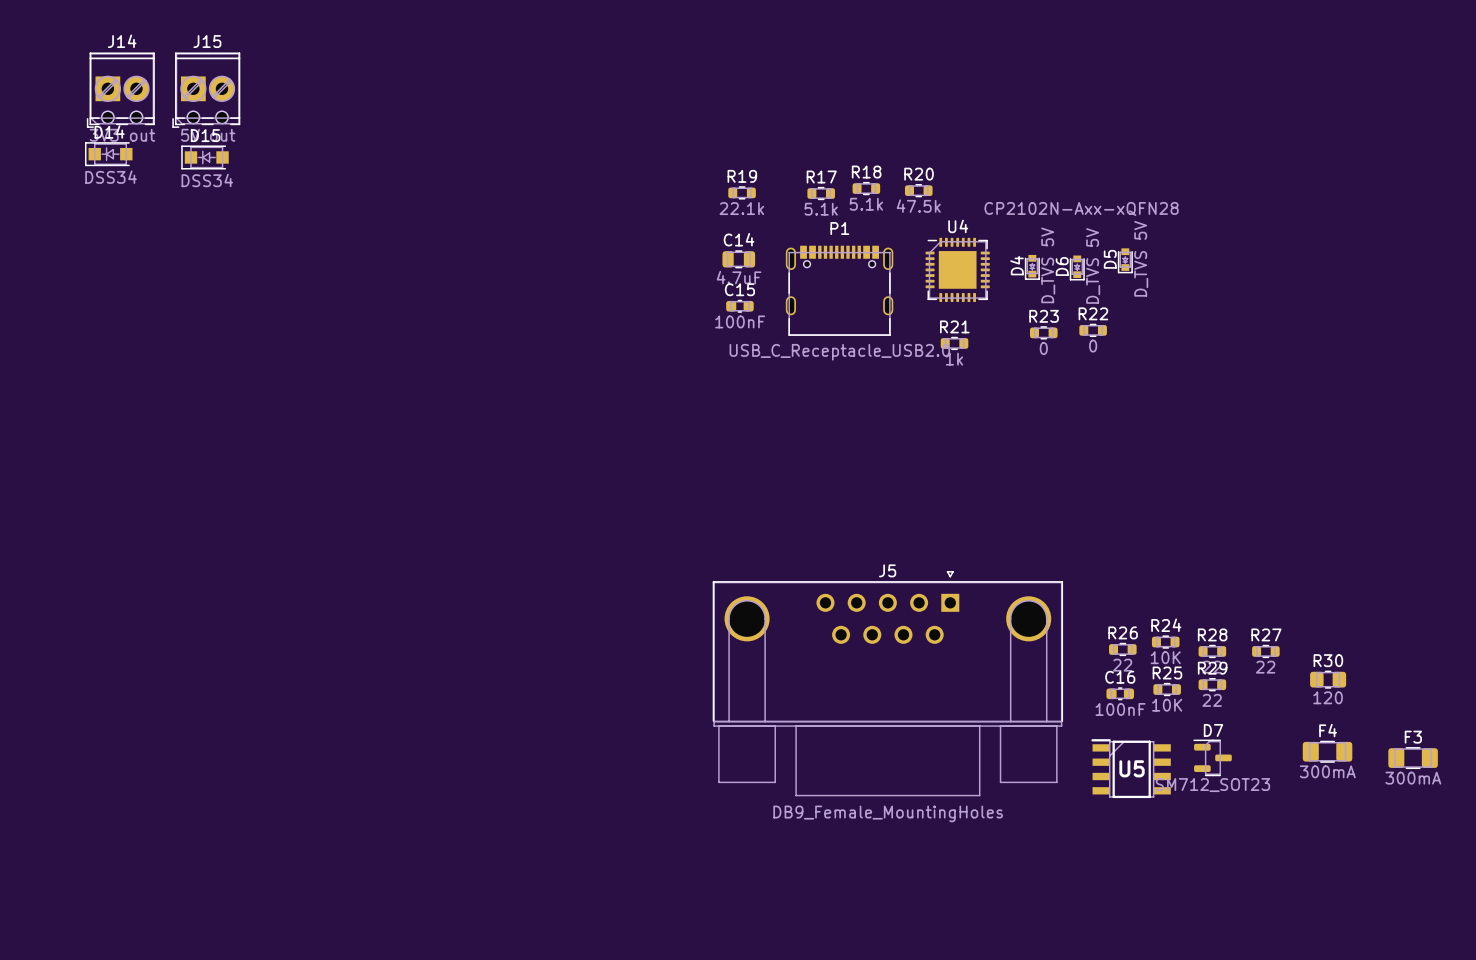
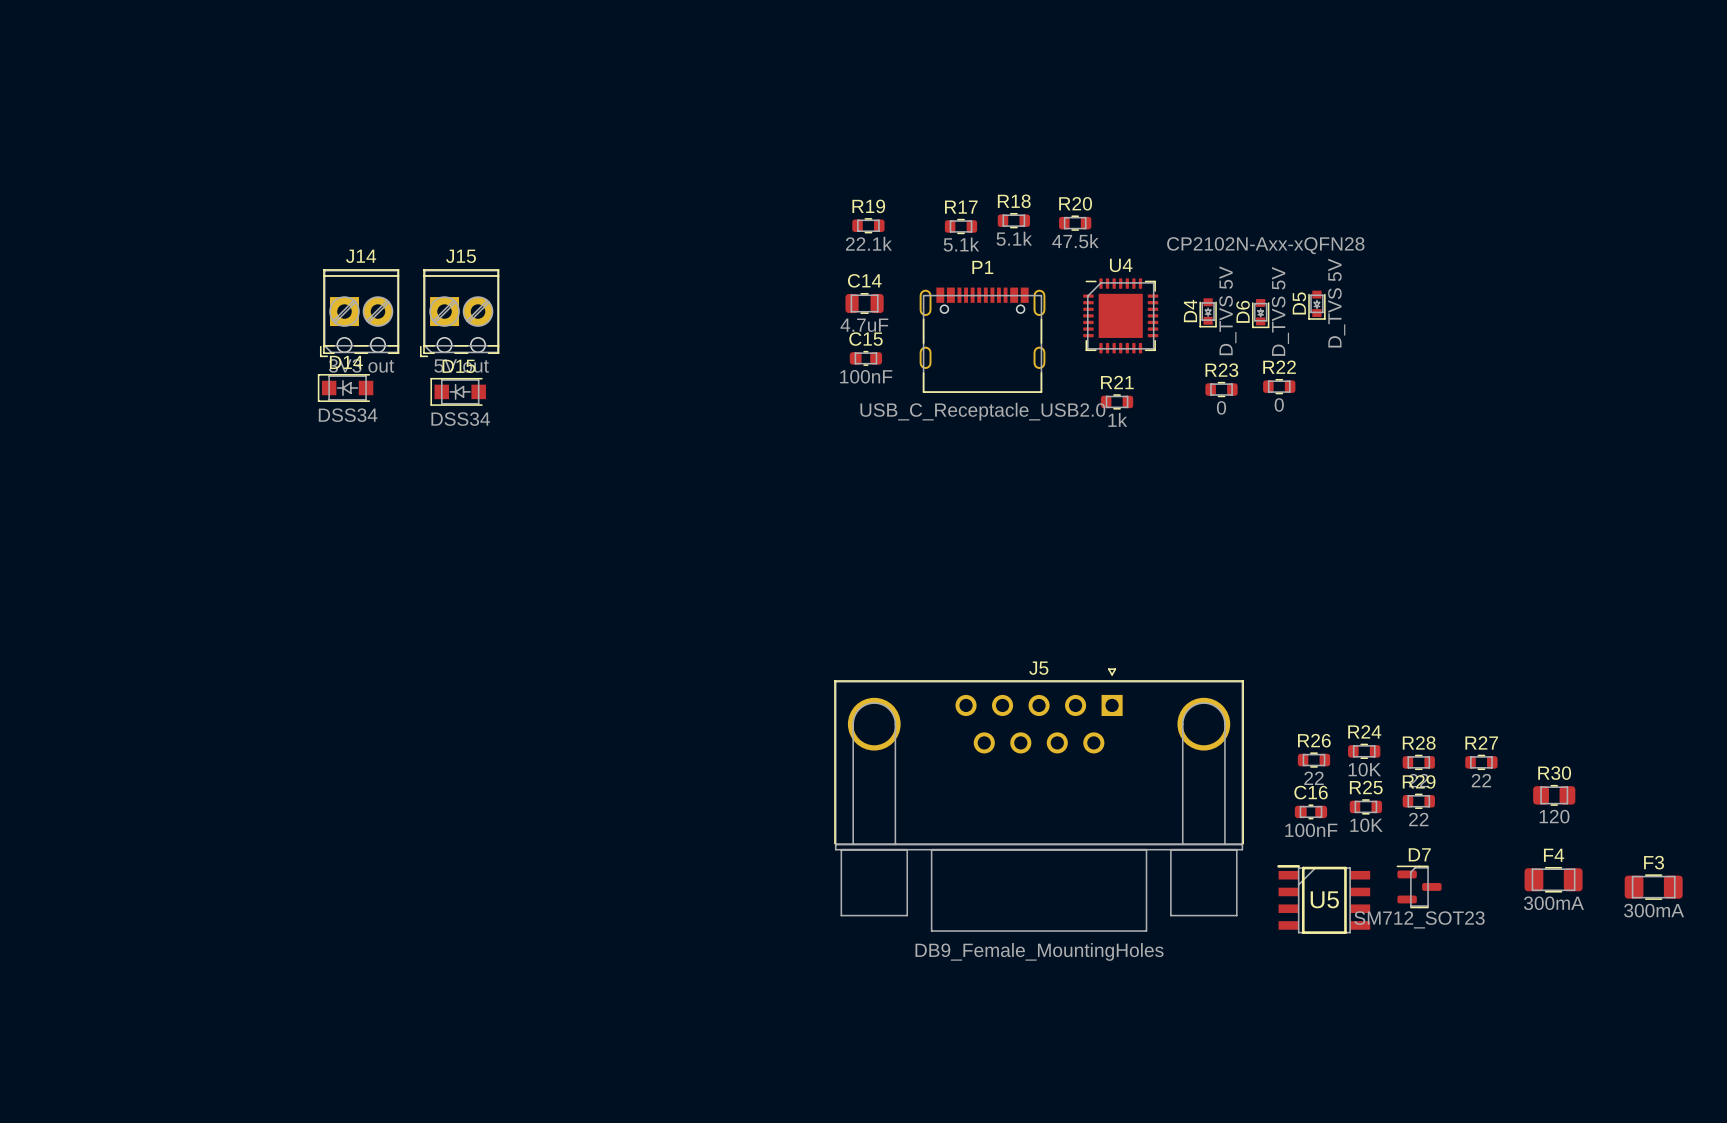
J14 position: (120, 90) -> (359, 313)
J15 position: (206, 90) -> (459, 313)
D14 position: (108, 154) -> (345, 388)
D15 position: (205, 157) -> (458, 391)

